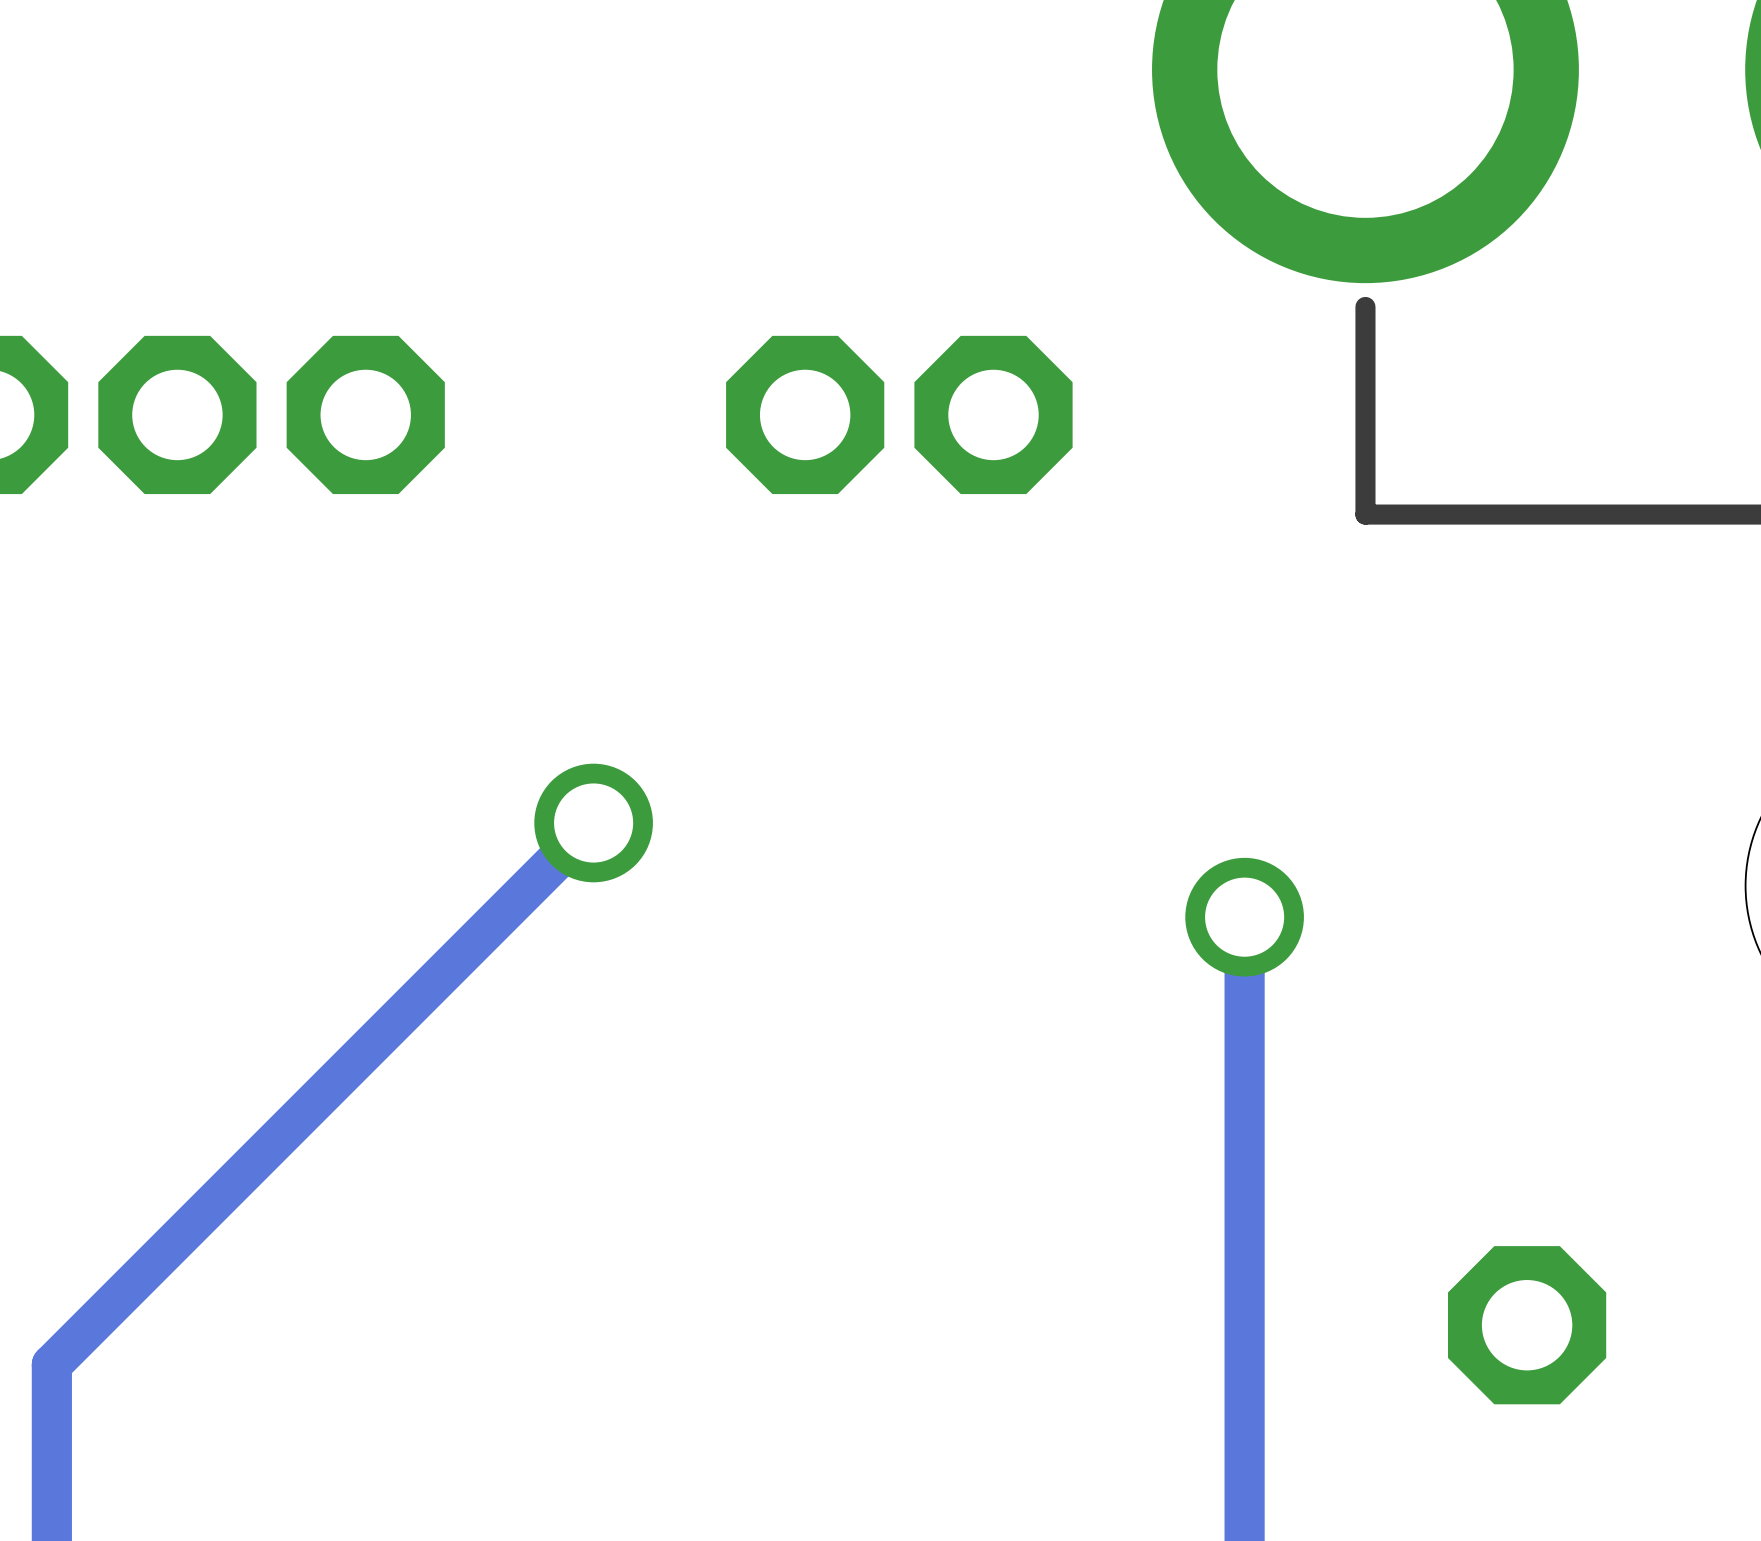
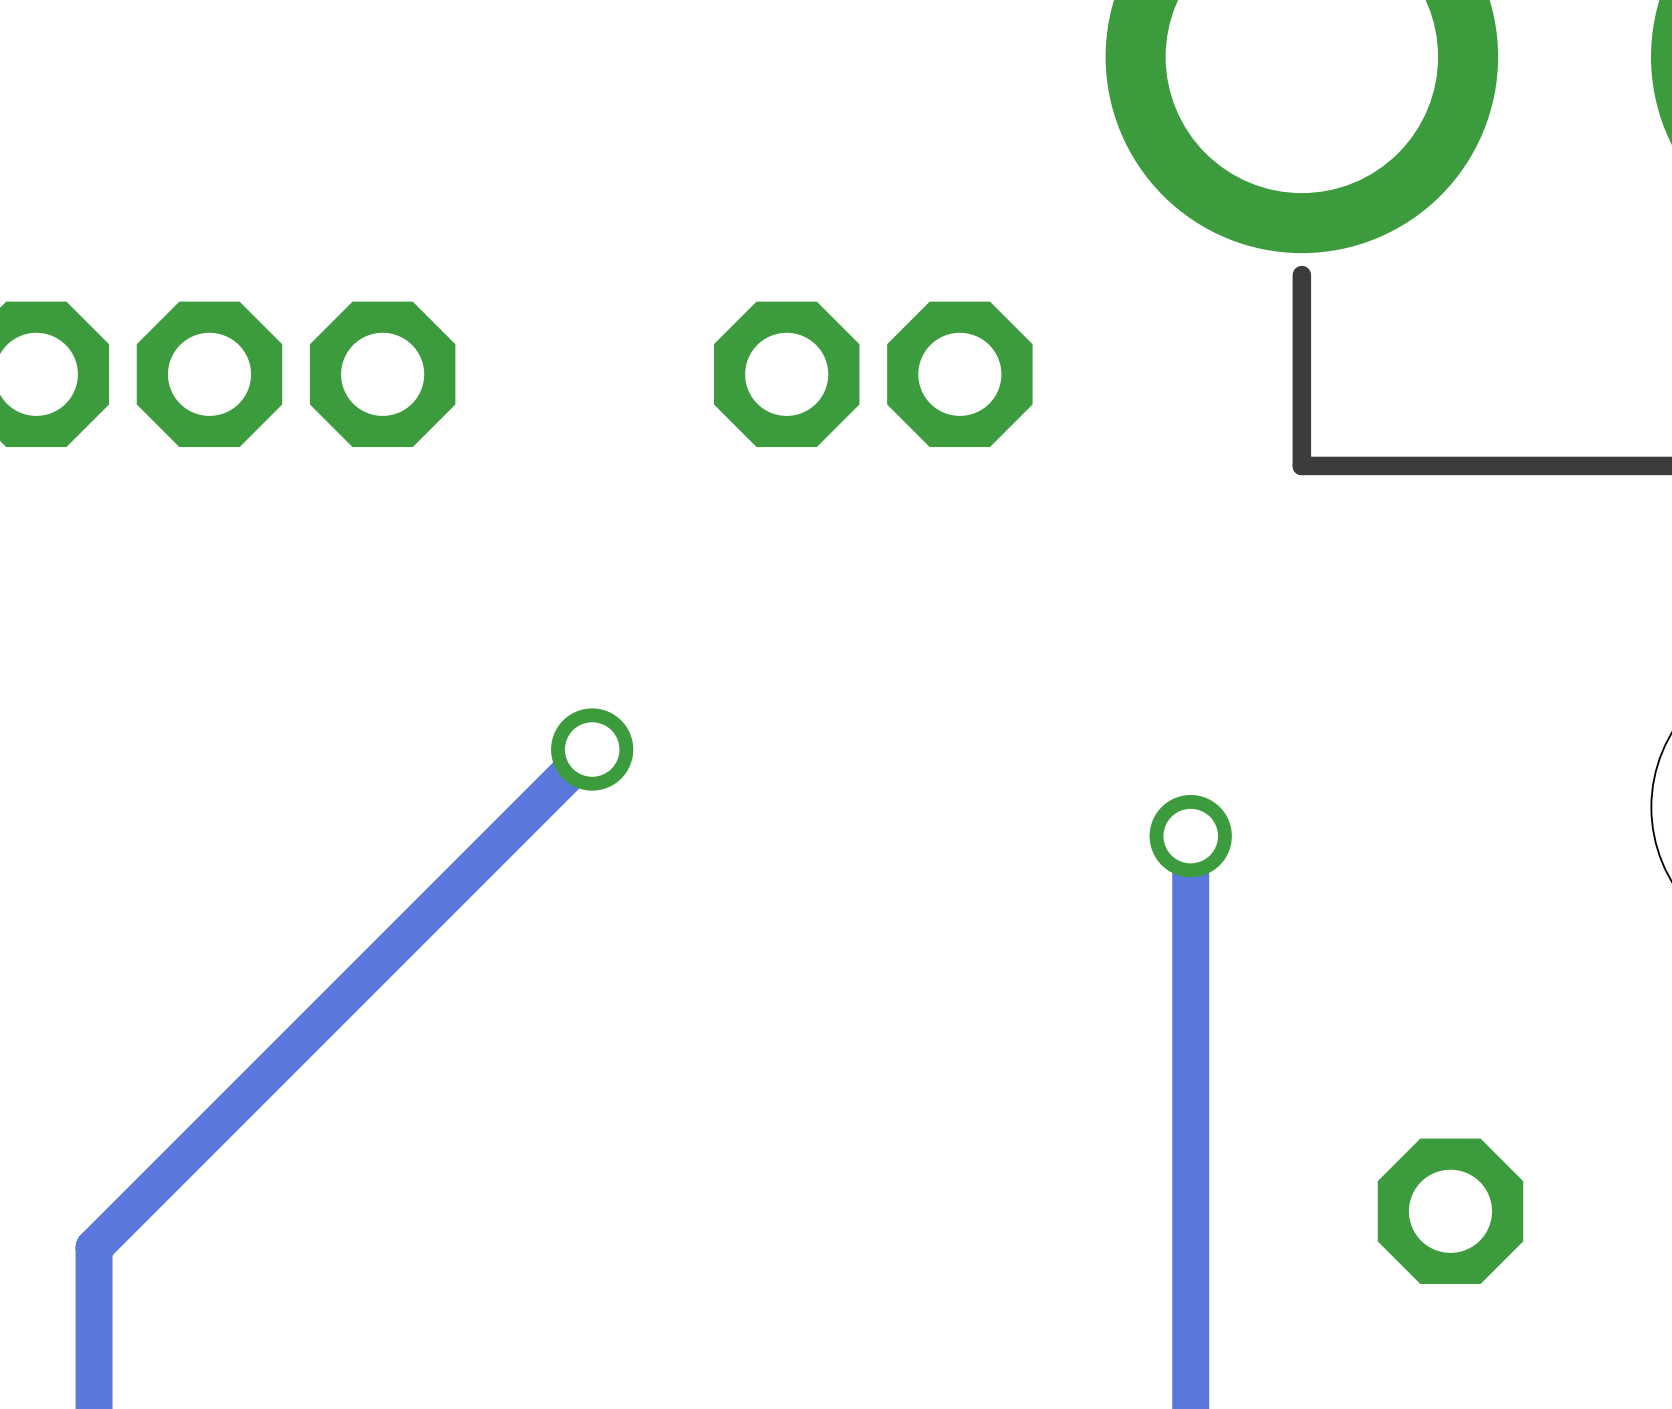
via size: [534, 763, 653, 883] -> [551, 708, 634, 791]
via size: [1185, 857, 1304, 977] -> [1149, 794, 1232, 878]

